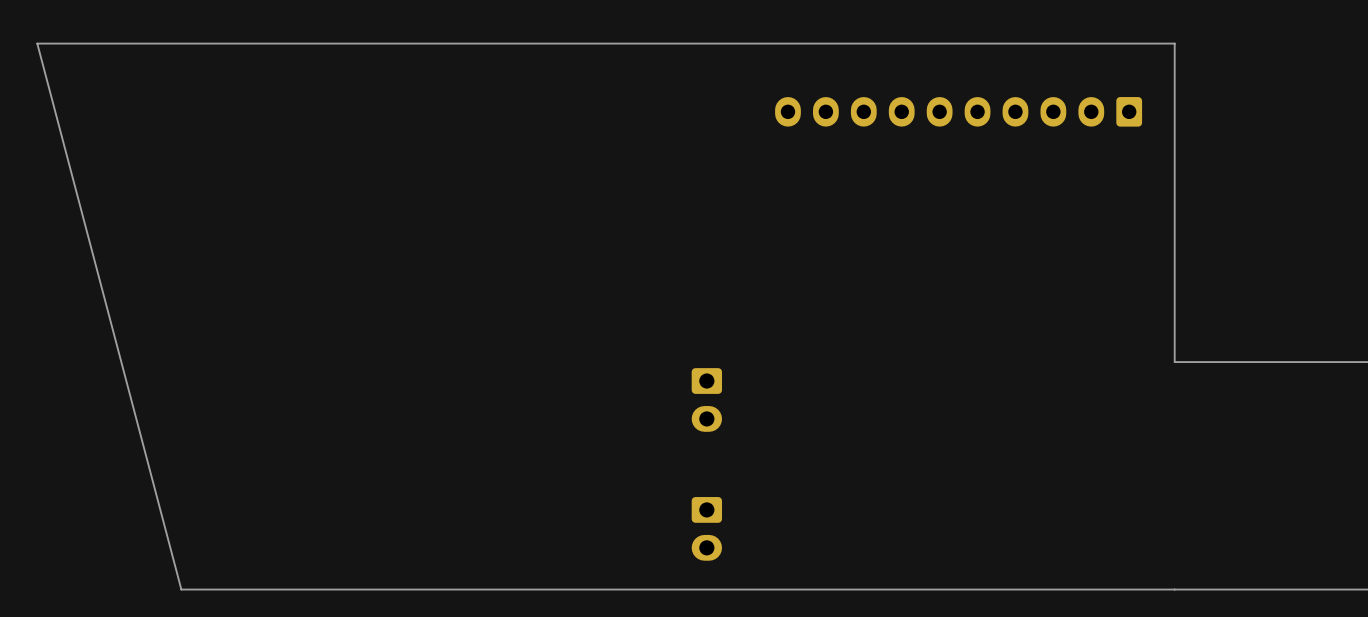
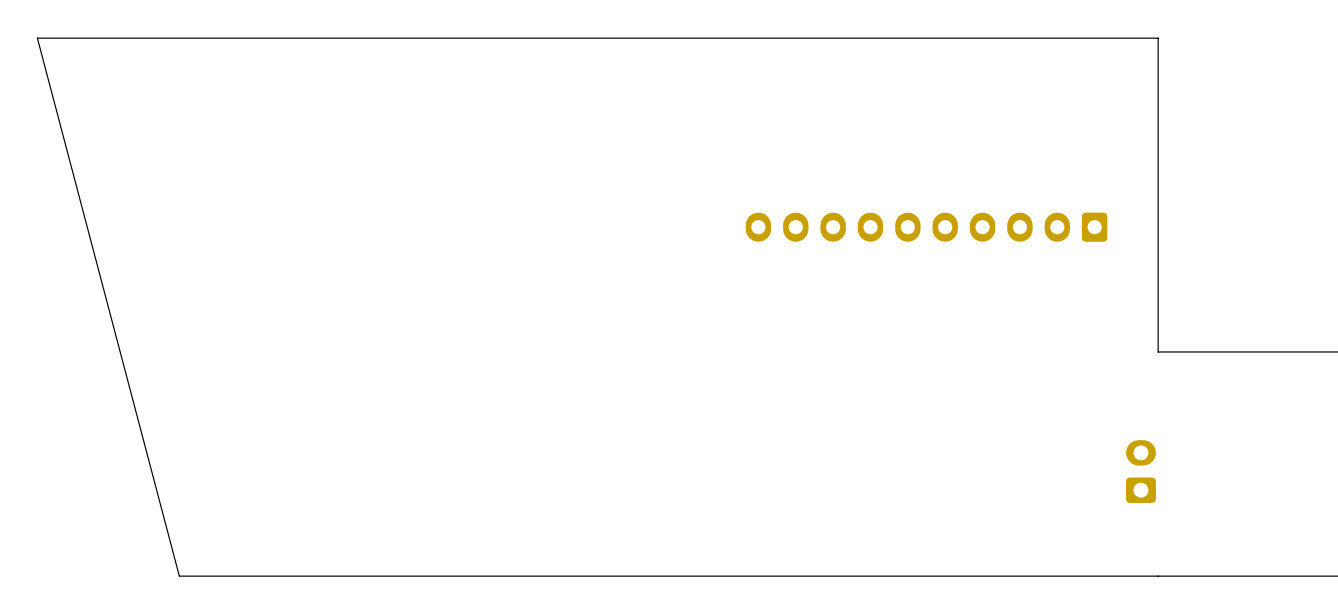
part position: (958, 111) -> (926, 227)
part: (706, 399) -> none
part: none -> (1140, 471)
part: (706, 528) -> none

